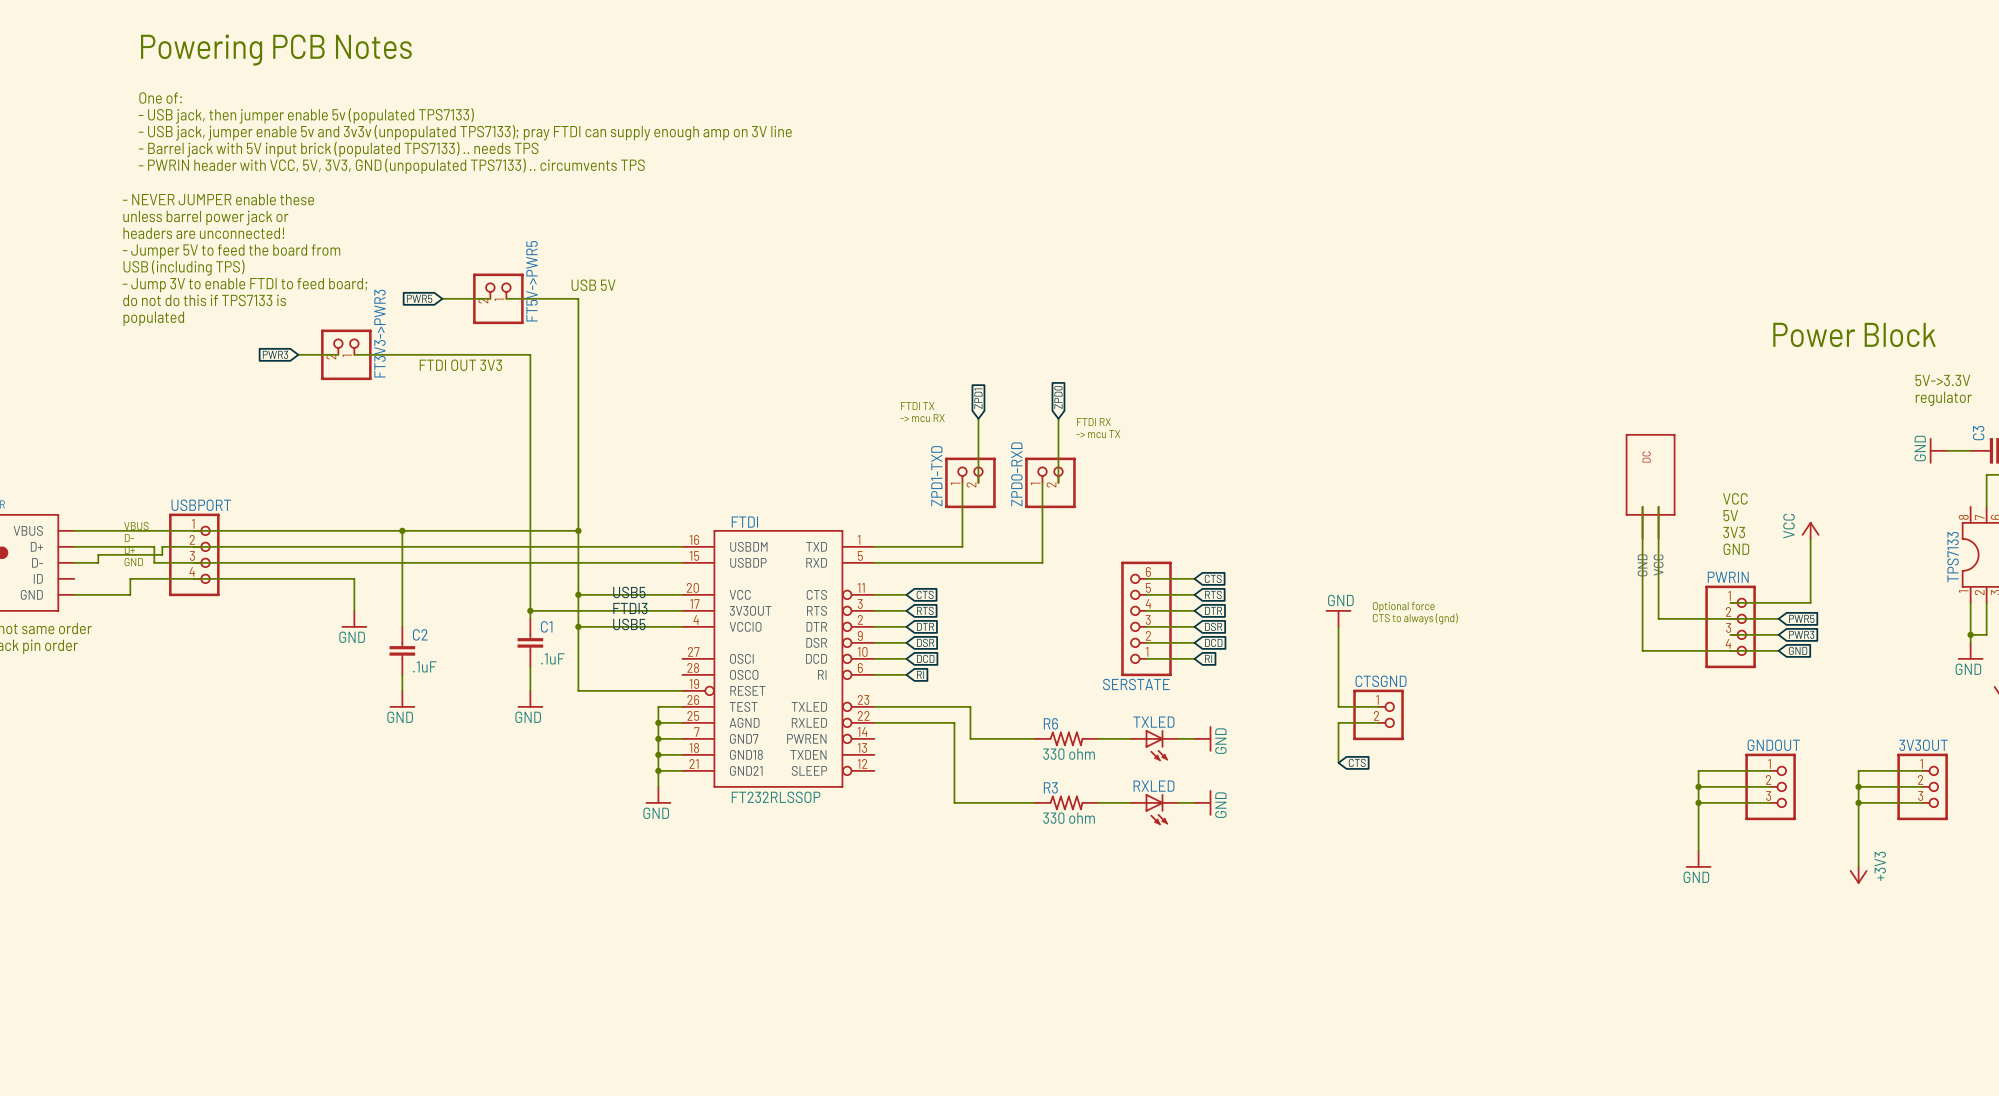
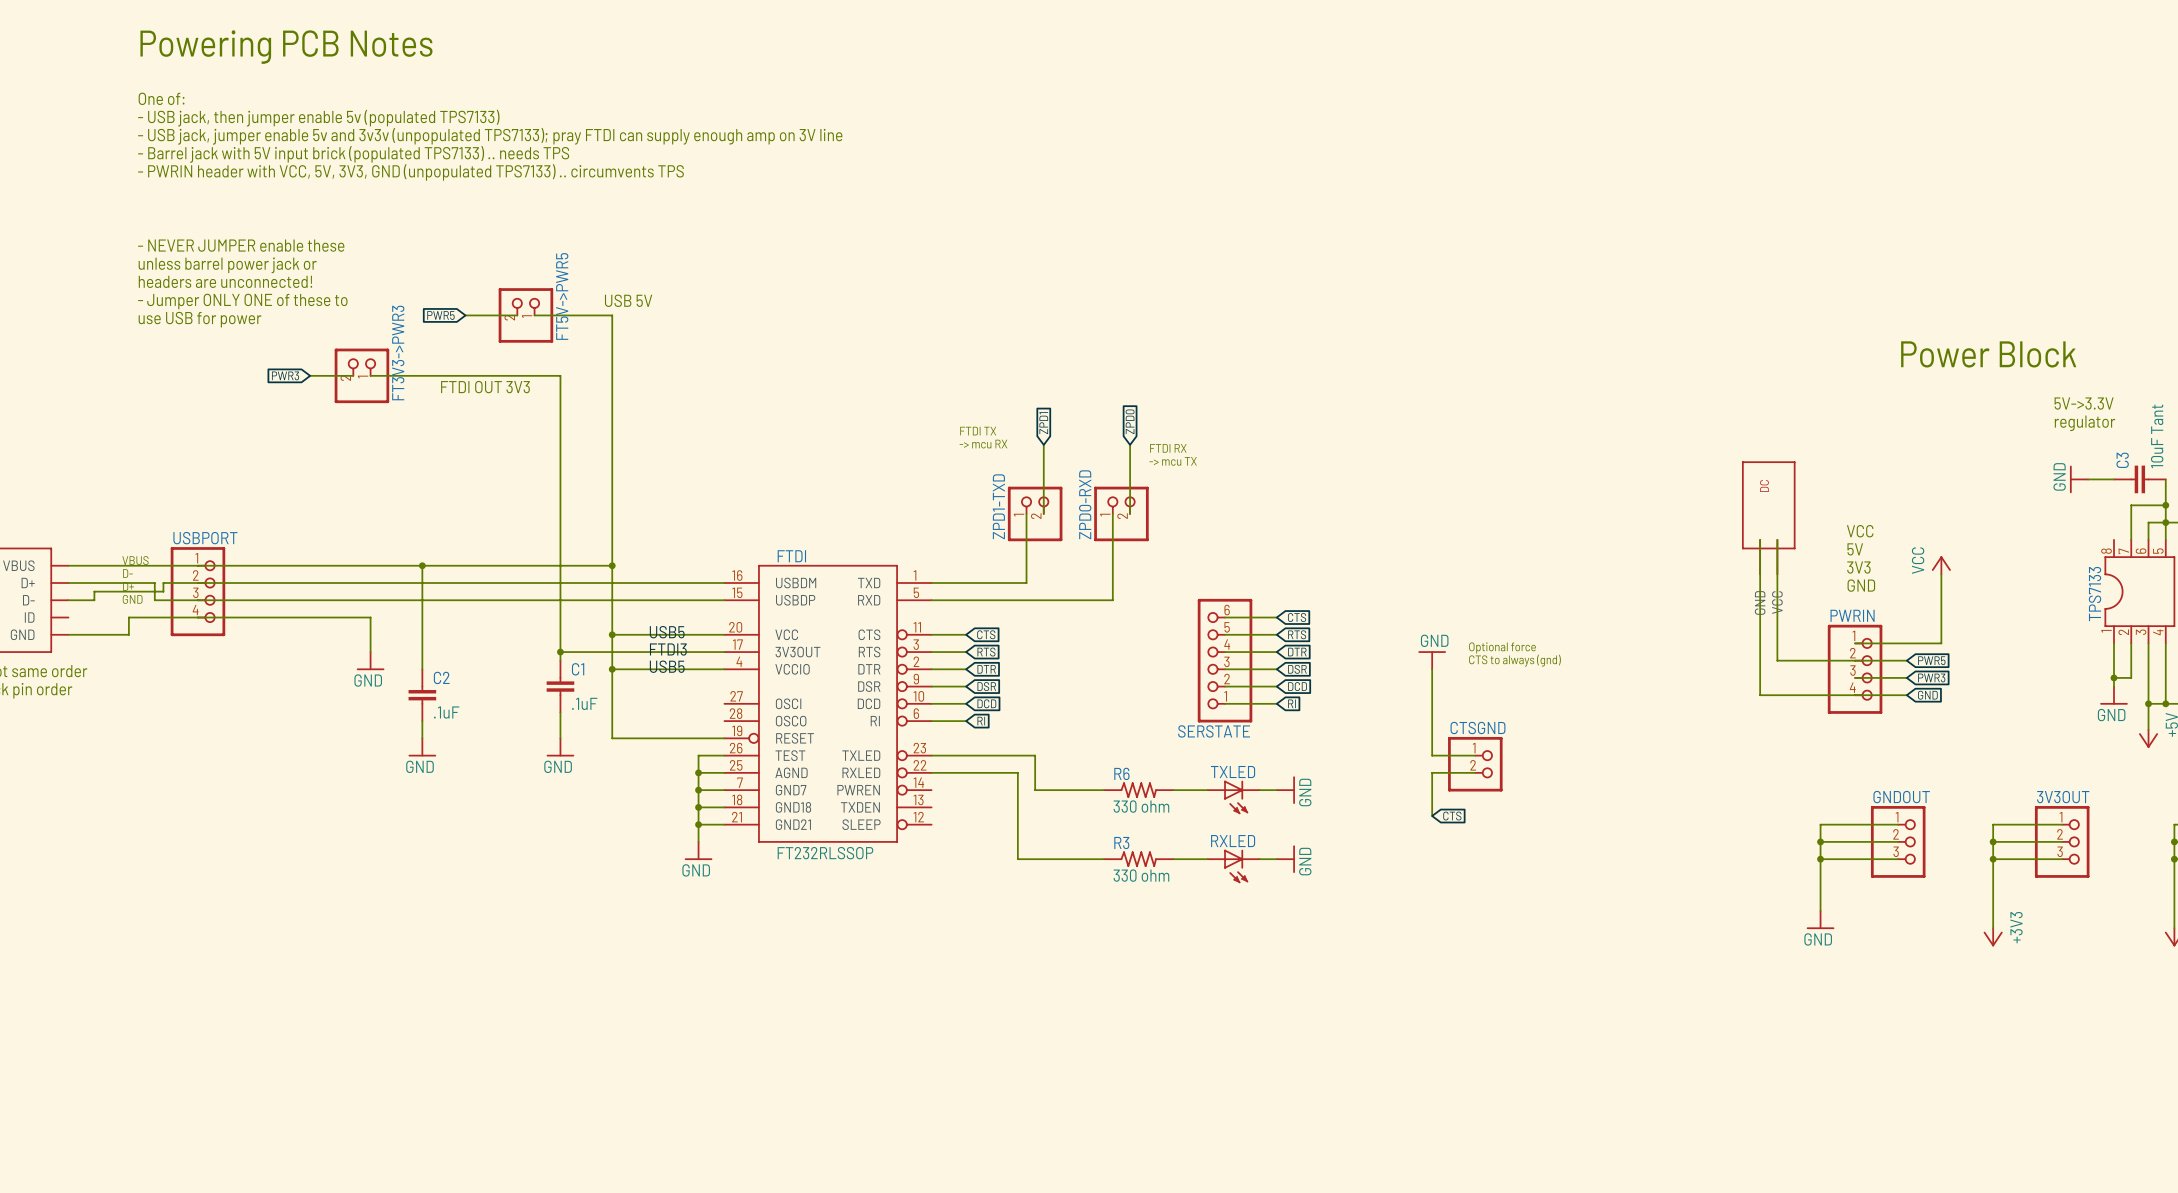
text position: - NEVER JUMPER enable these (218, 199) -> - NEVER JUMPER enable these (241, 245)
text position: unless barrel power jack or (205, 217) -> unless barrel power jack or (227, 265)
text position: headers are unconnected! (203, 233) -> headers are unconnected! (225, 281)
text: - Jumper 5V to feed the board from (231, 251) -> none
text: USB (including TPS) (184, 267) -> none
text: none -> - Jumper ONLY ONE of these to (242, 301)
text: - Jump 3V to enable FTDI to feed board; (245, 285) -> none
text: do not do this if TPS7133 is (204, 300) -> none
text: none -> use USB for power (200, 319)
text: populated (153, 318) -> none

